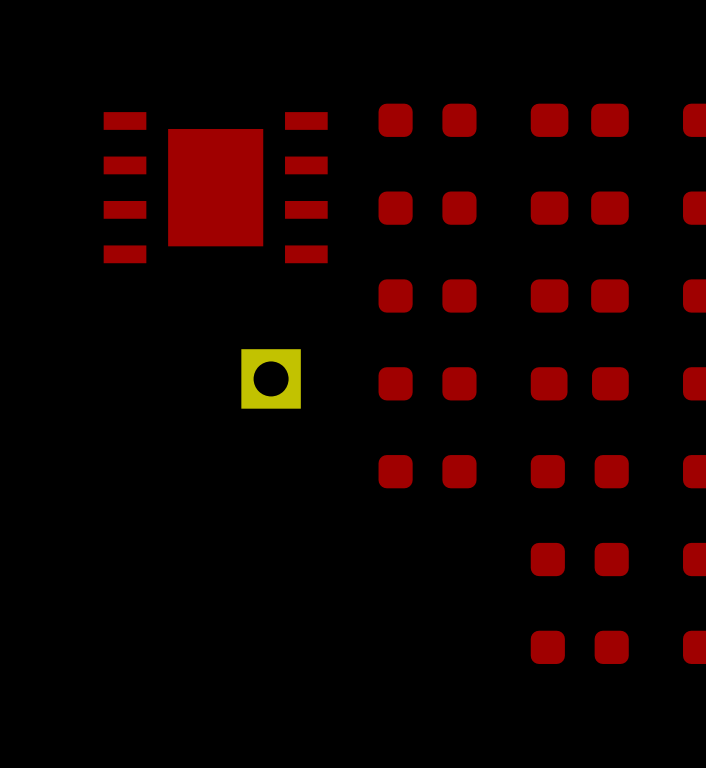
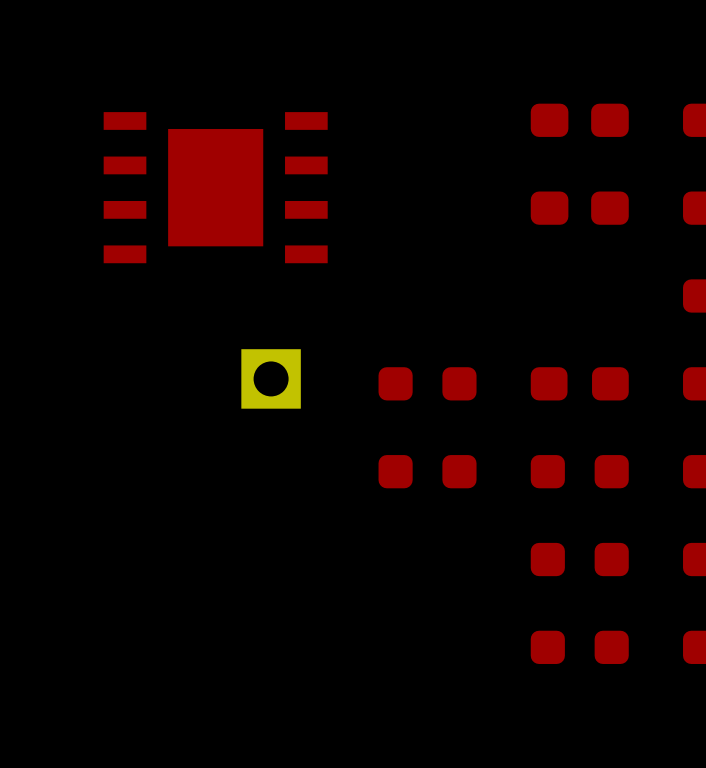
part: (427, 120) -> none
part: (427, 208) -> none
part: (427, 295) -> none
part: (579, 295) -> none

